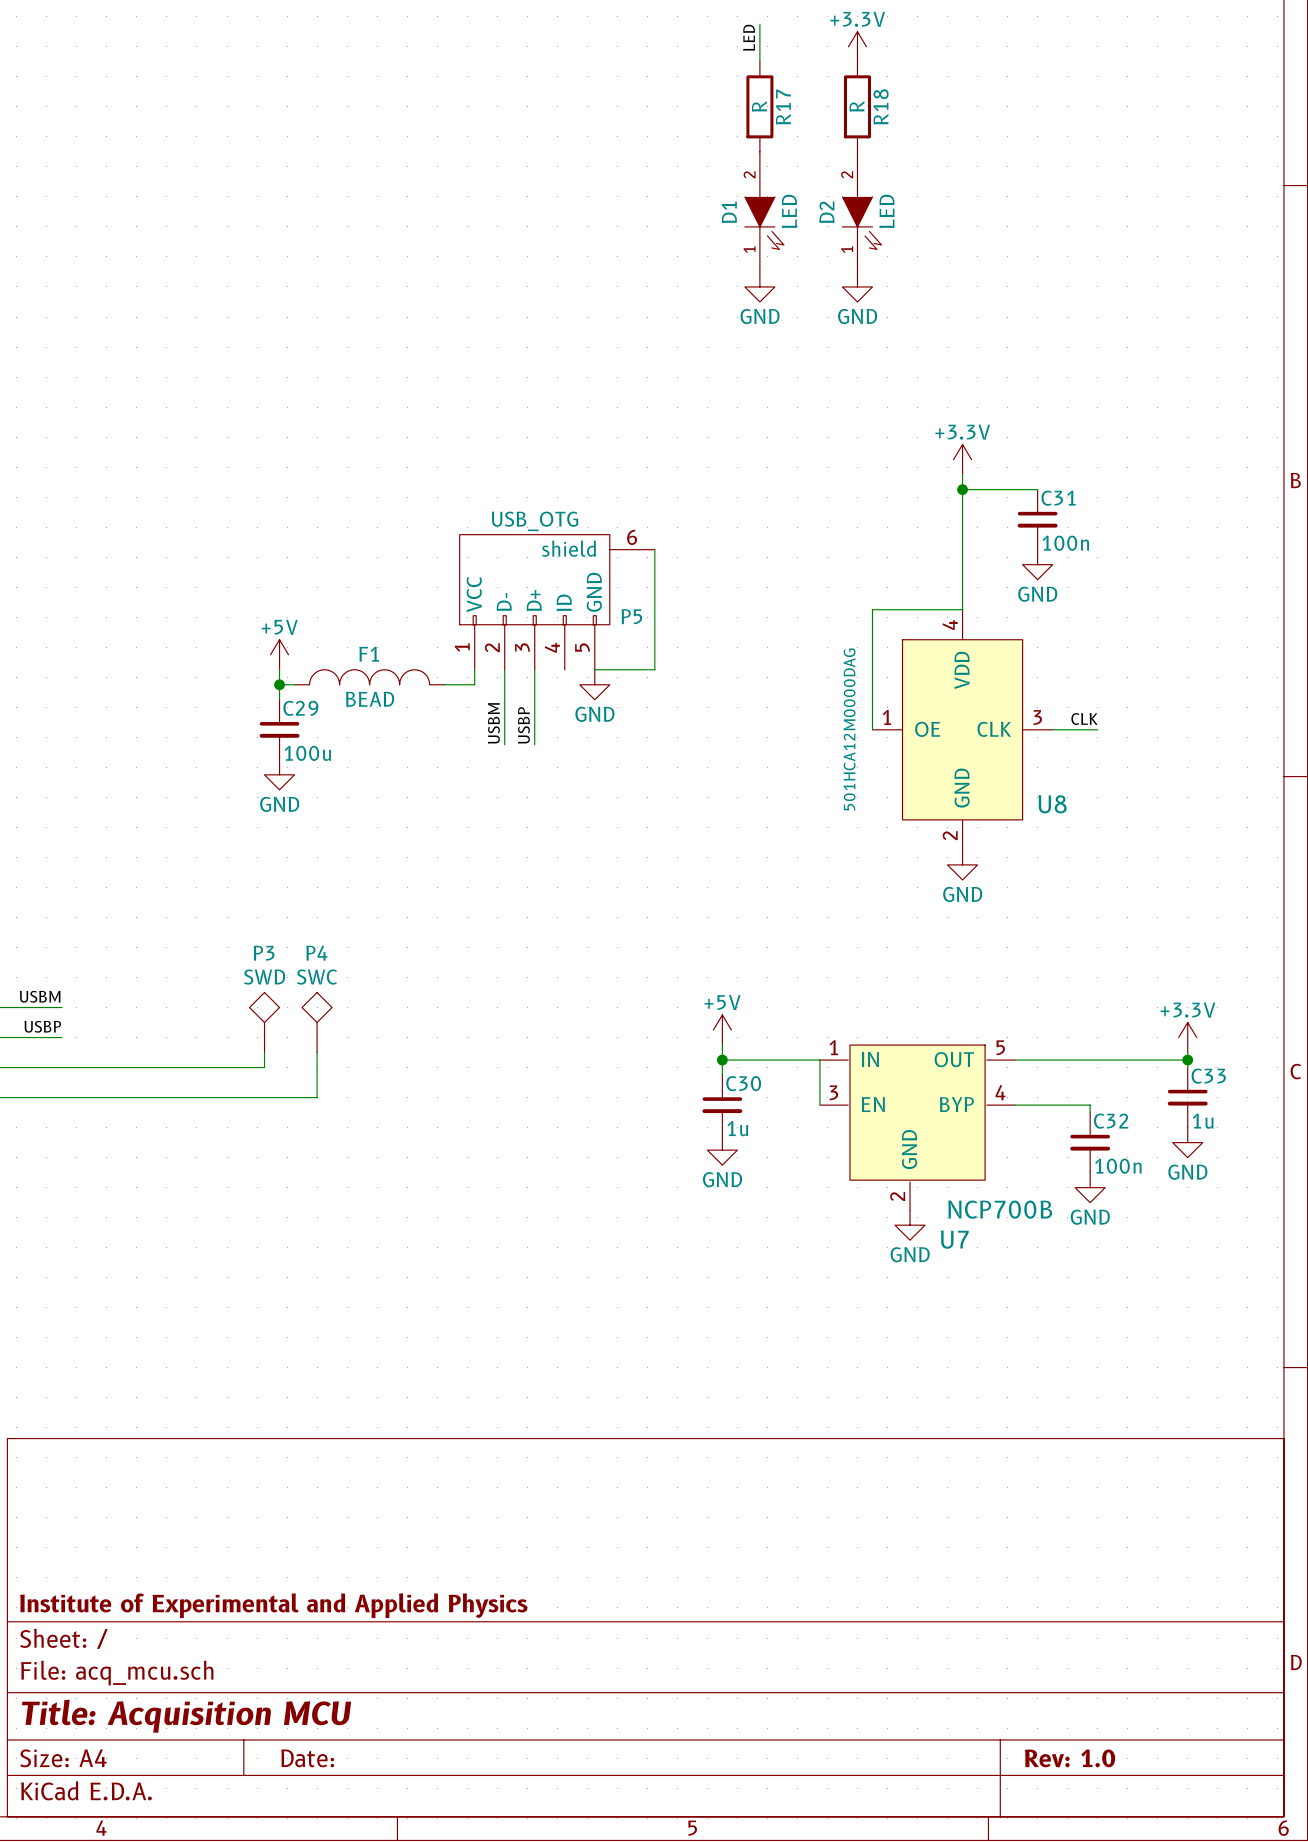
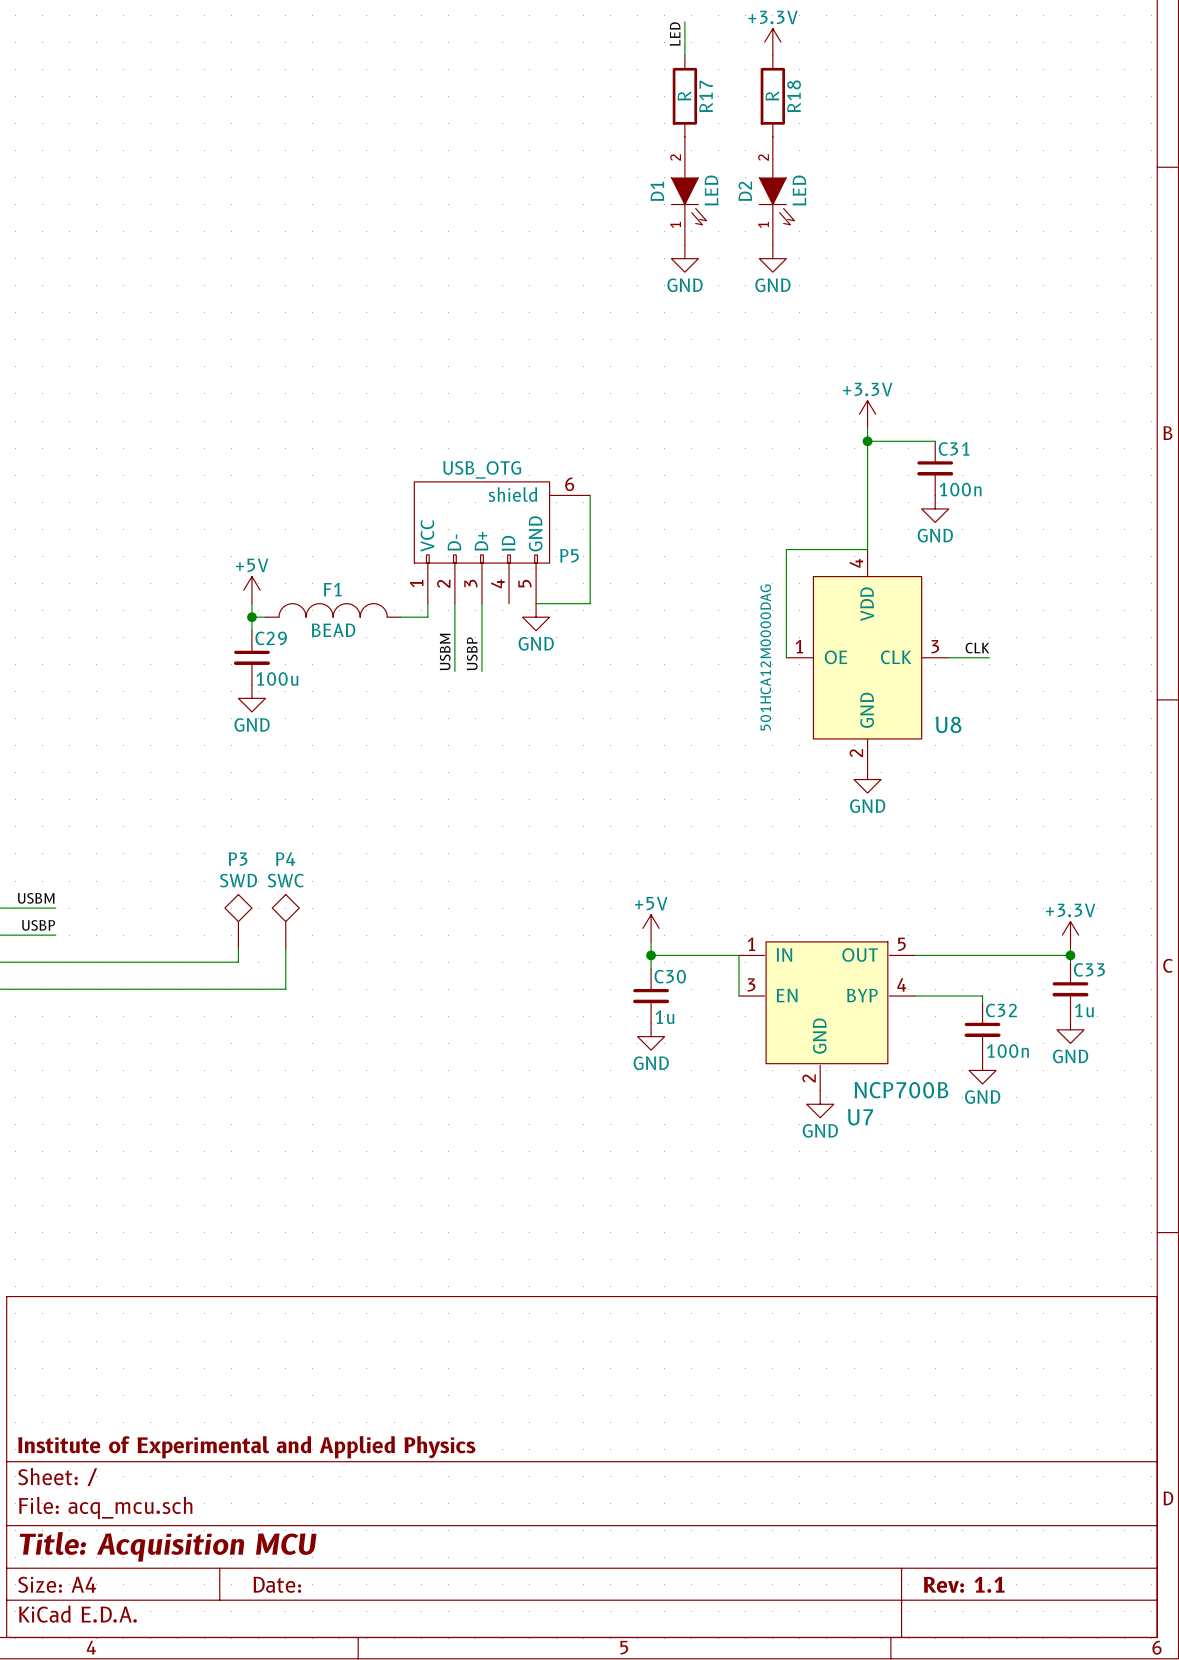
title block: Rev: 1.0 (1070, 1758) -> Rev: 1.1 (964, 1584)

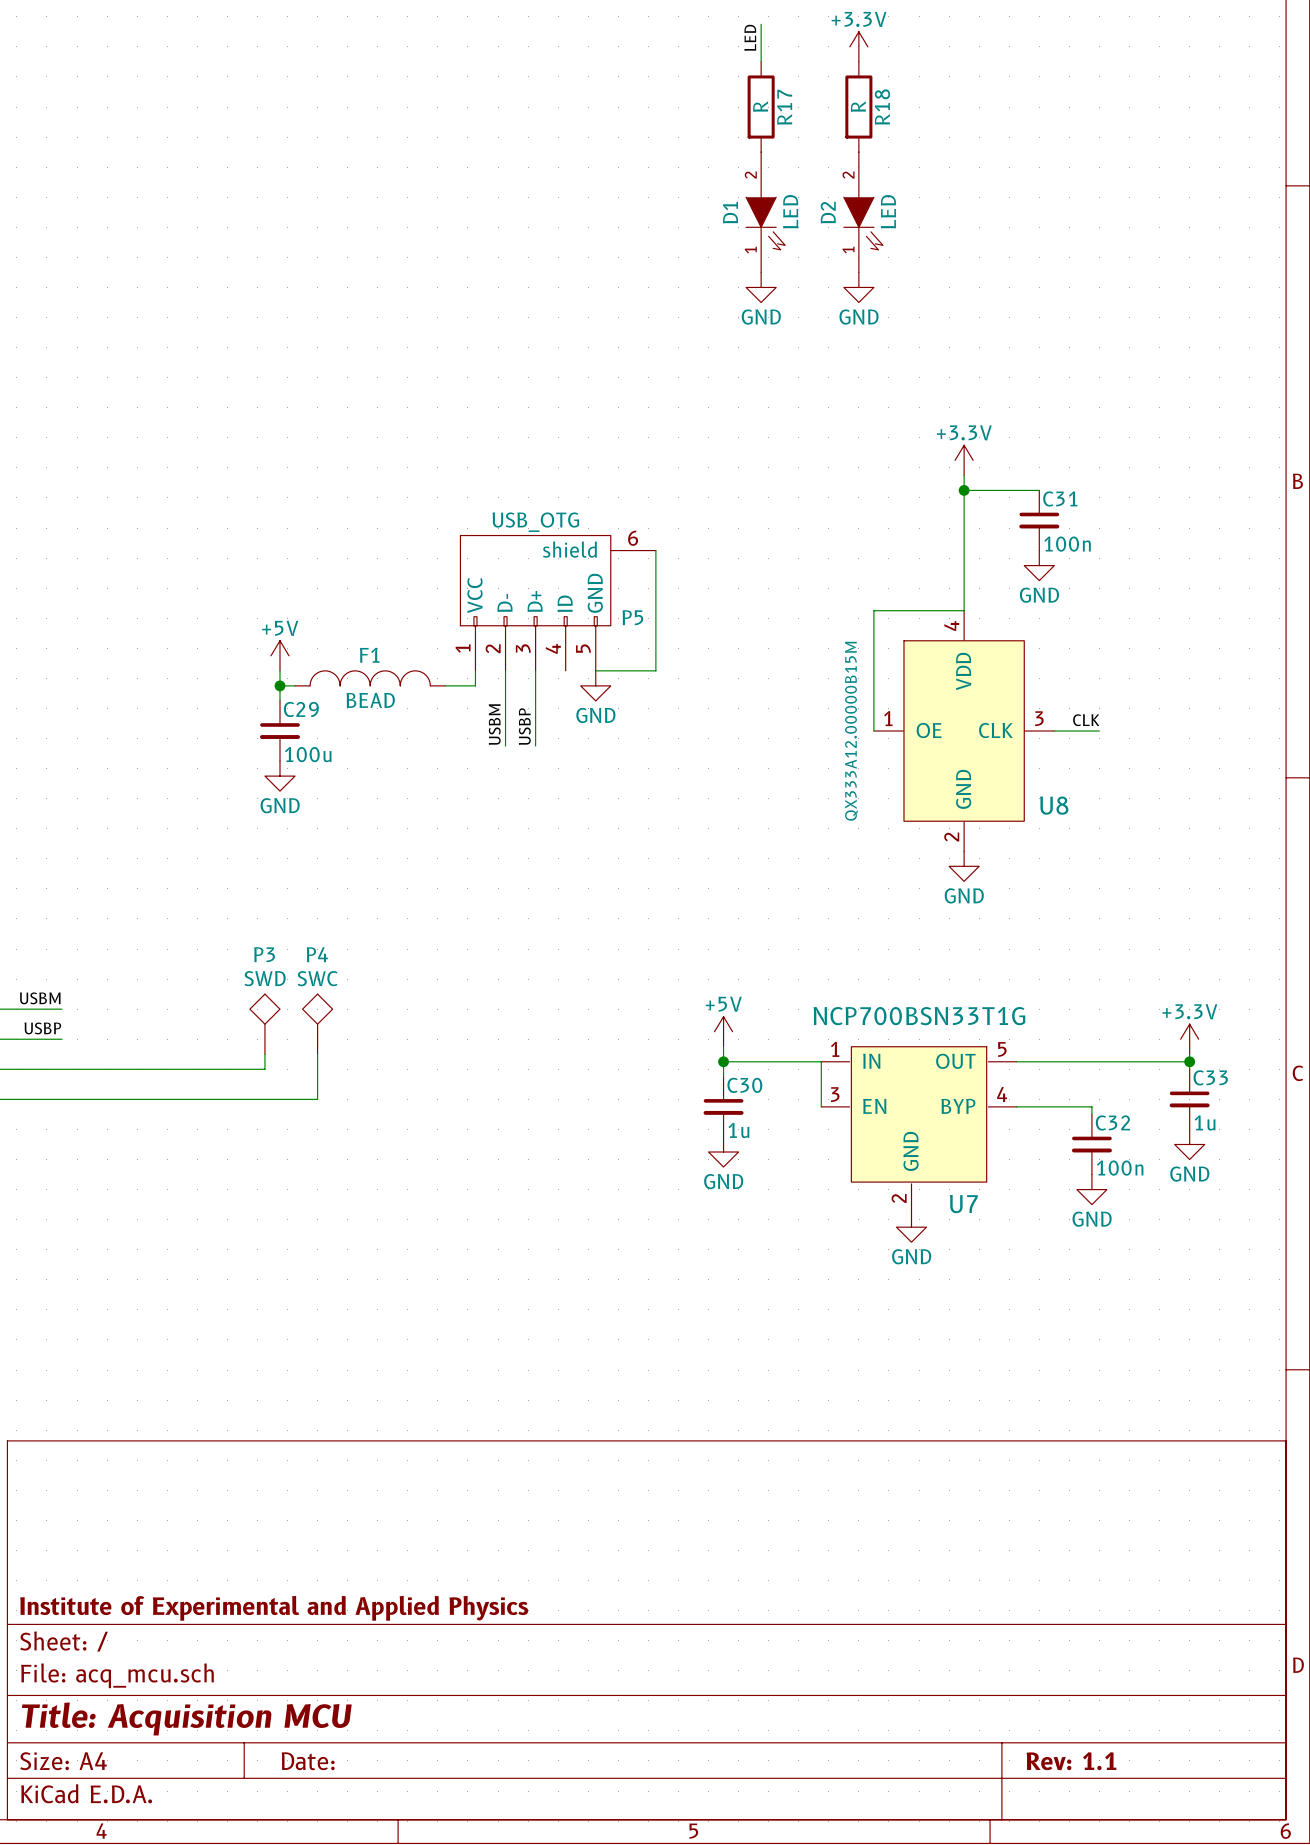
U8 value: 501HCA12M0000DAG (765, 657) -> QX333A12.00000B15M (851, 731)
U7 value: NCP700B (901, 1090) -> NCP700BSN33T1G (919, 1016)
U7 name position: U7 (860, 1117) -> U7 (963, 1204)

